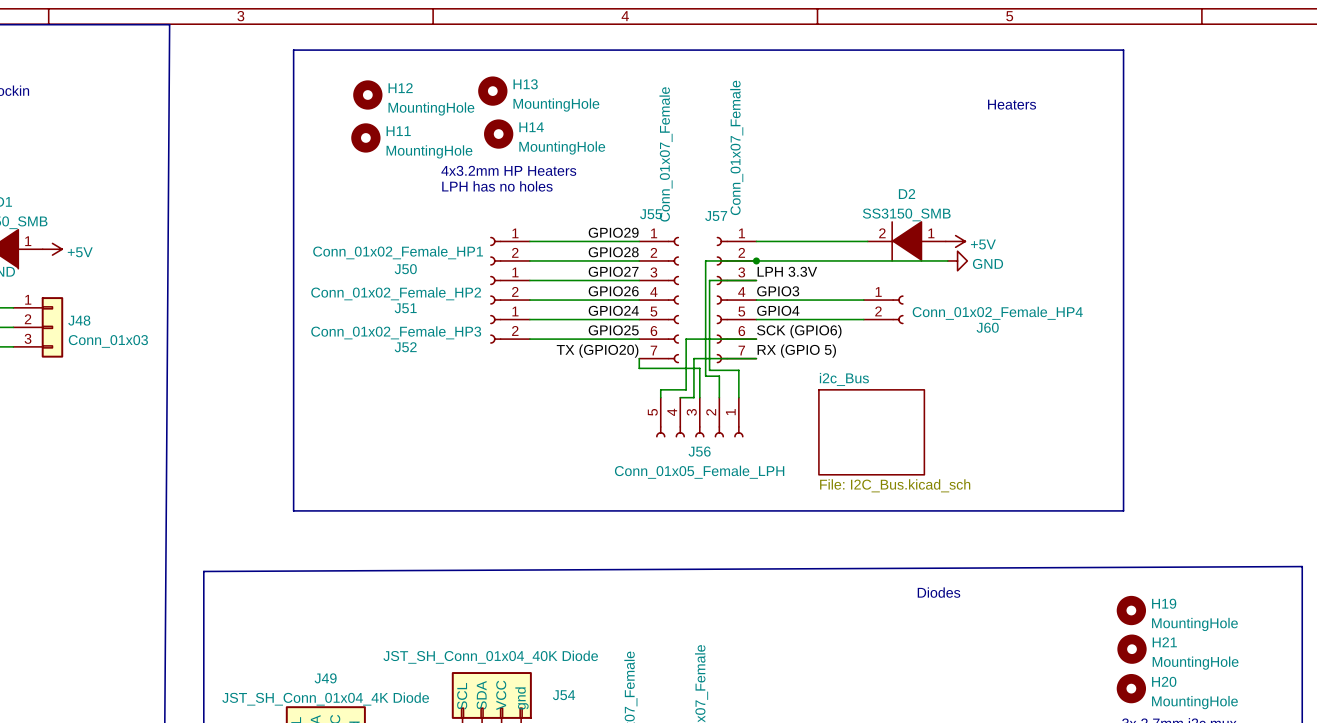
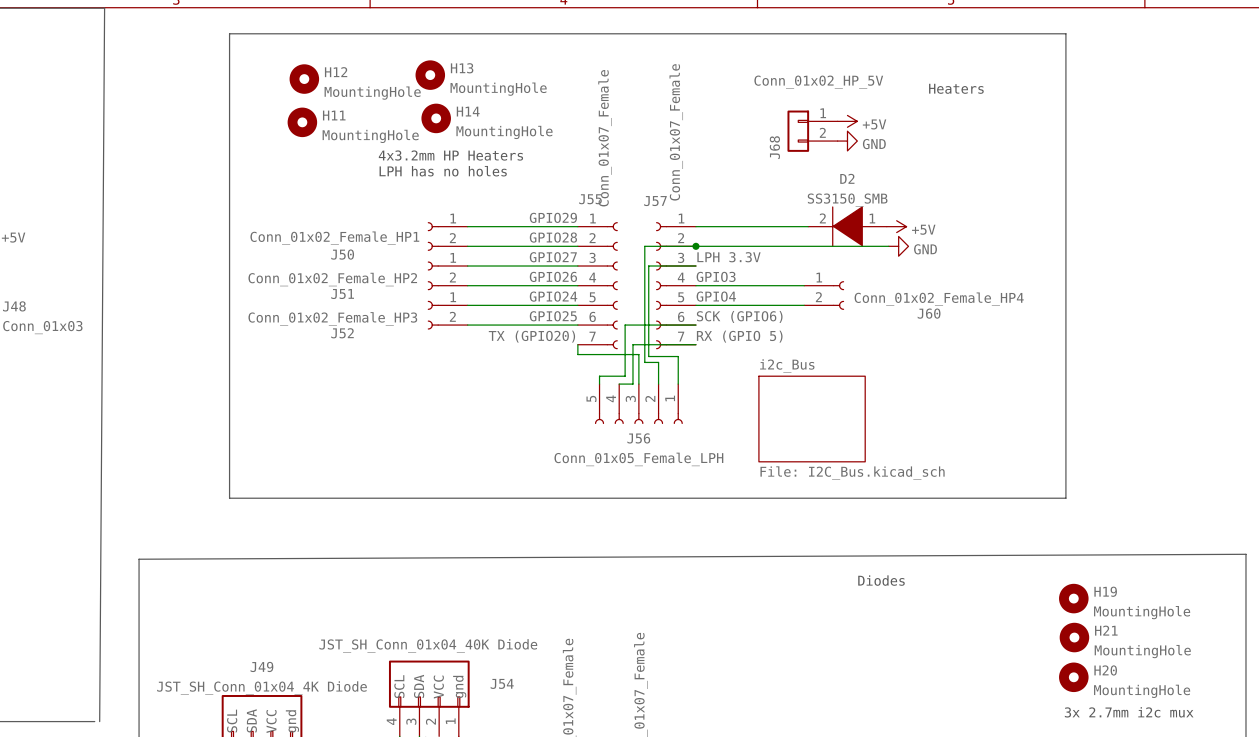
power symbol: none -> +5V (847, 121)
J68: none -> Conn_01x02_HP_5V (812, 131)
power symbol: none -> GND (847, 141)

